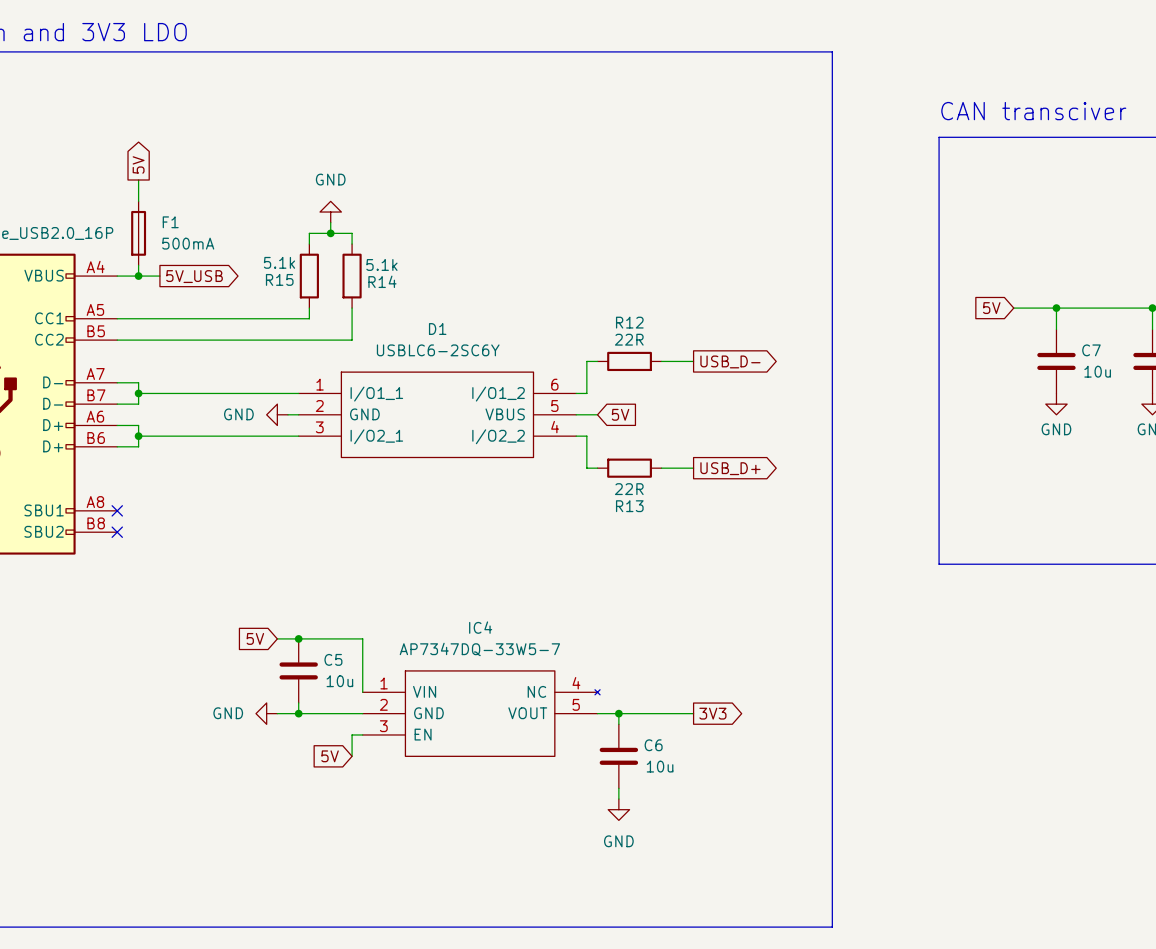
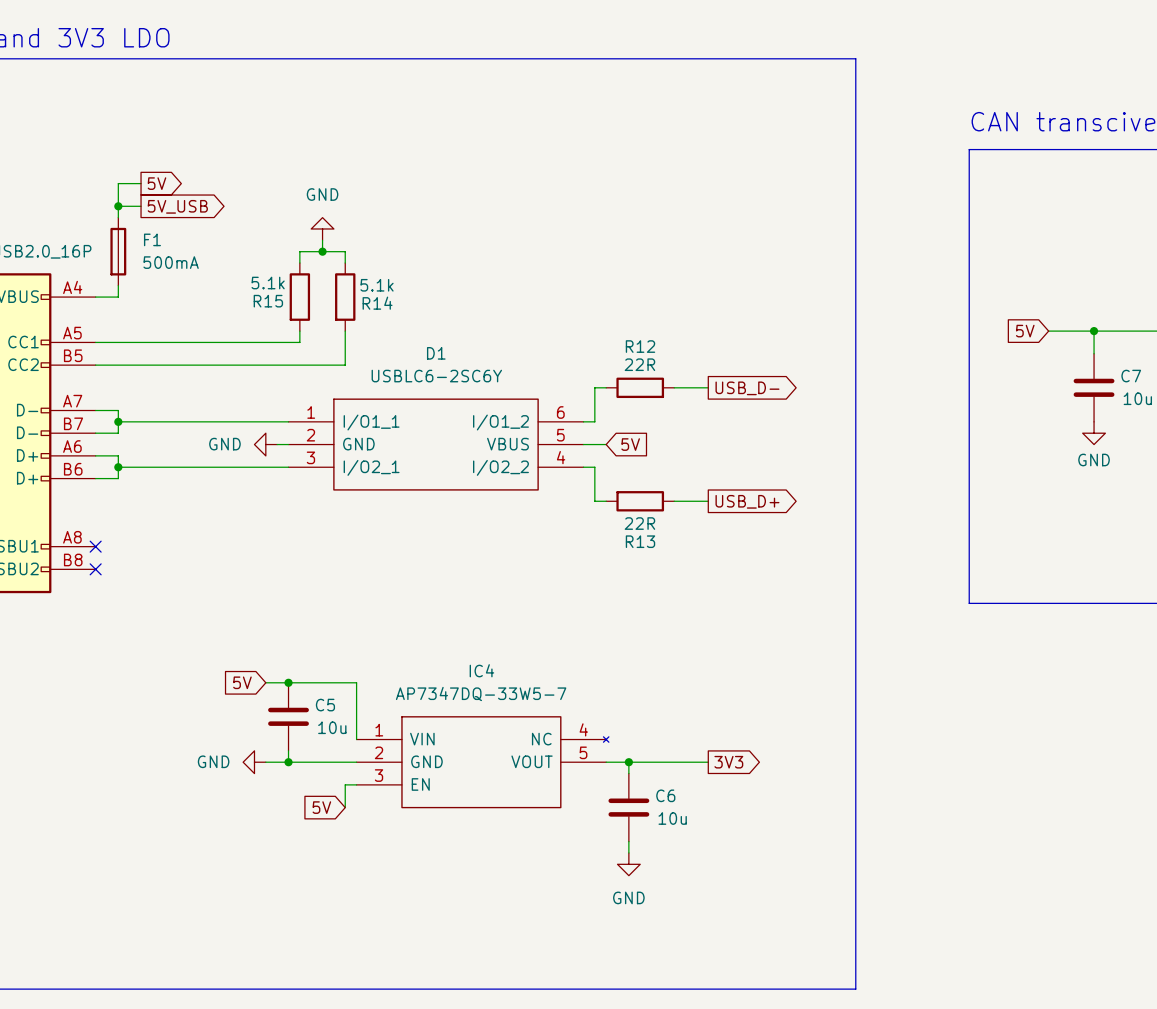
global label rotation: 0° (138, 164) -> 90° clockwise (156, 183)
wire: none -> (141, 183) (118, 183) (118, 194)
junction: none -> (118, 206)
wire: (138, 276) (159, 276) -> (118, 206) (141, 206)
junction: (138, 276) -> none
global label position: 5V_USB (194, 276) -> 5V_USB (177, 206)

